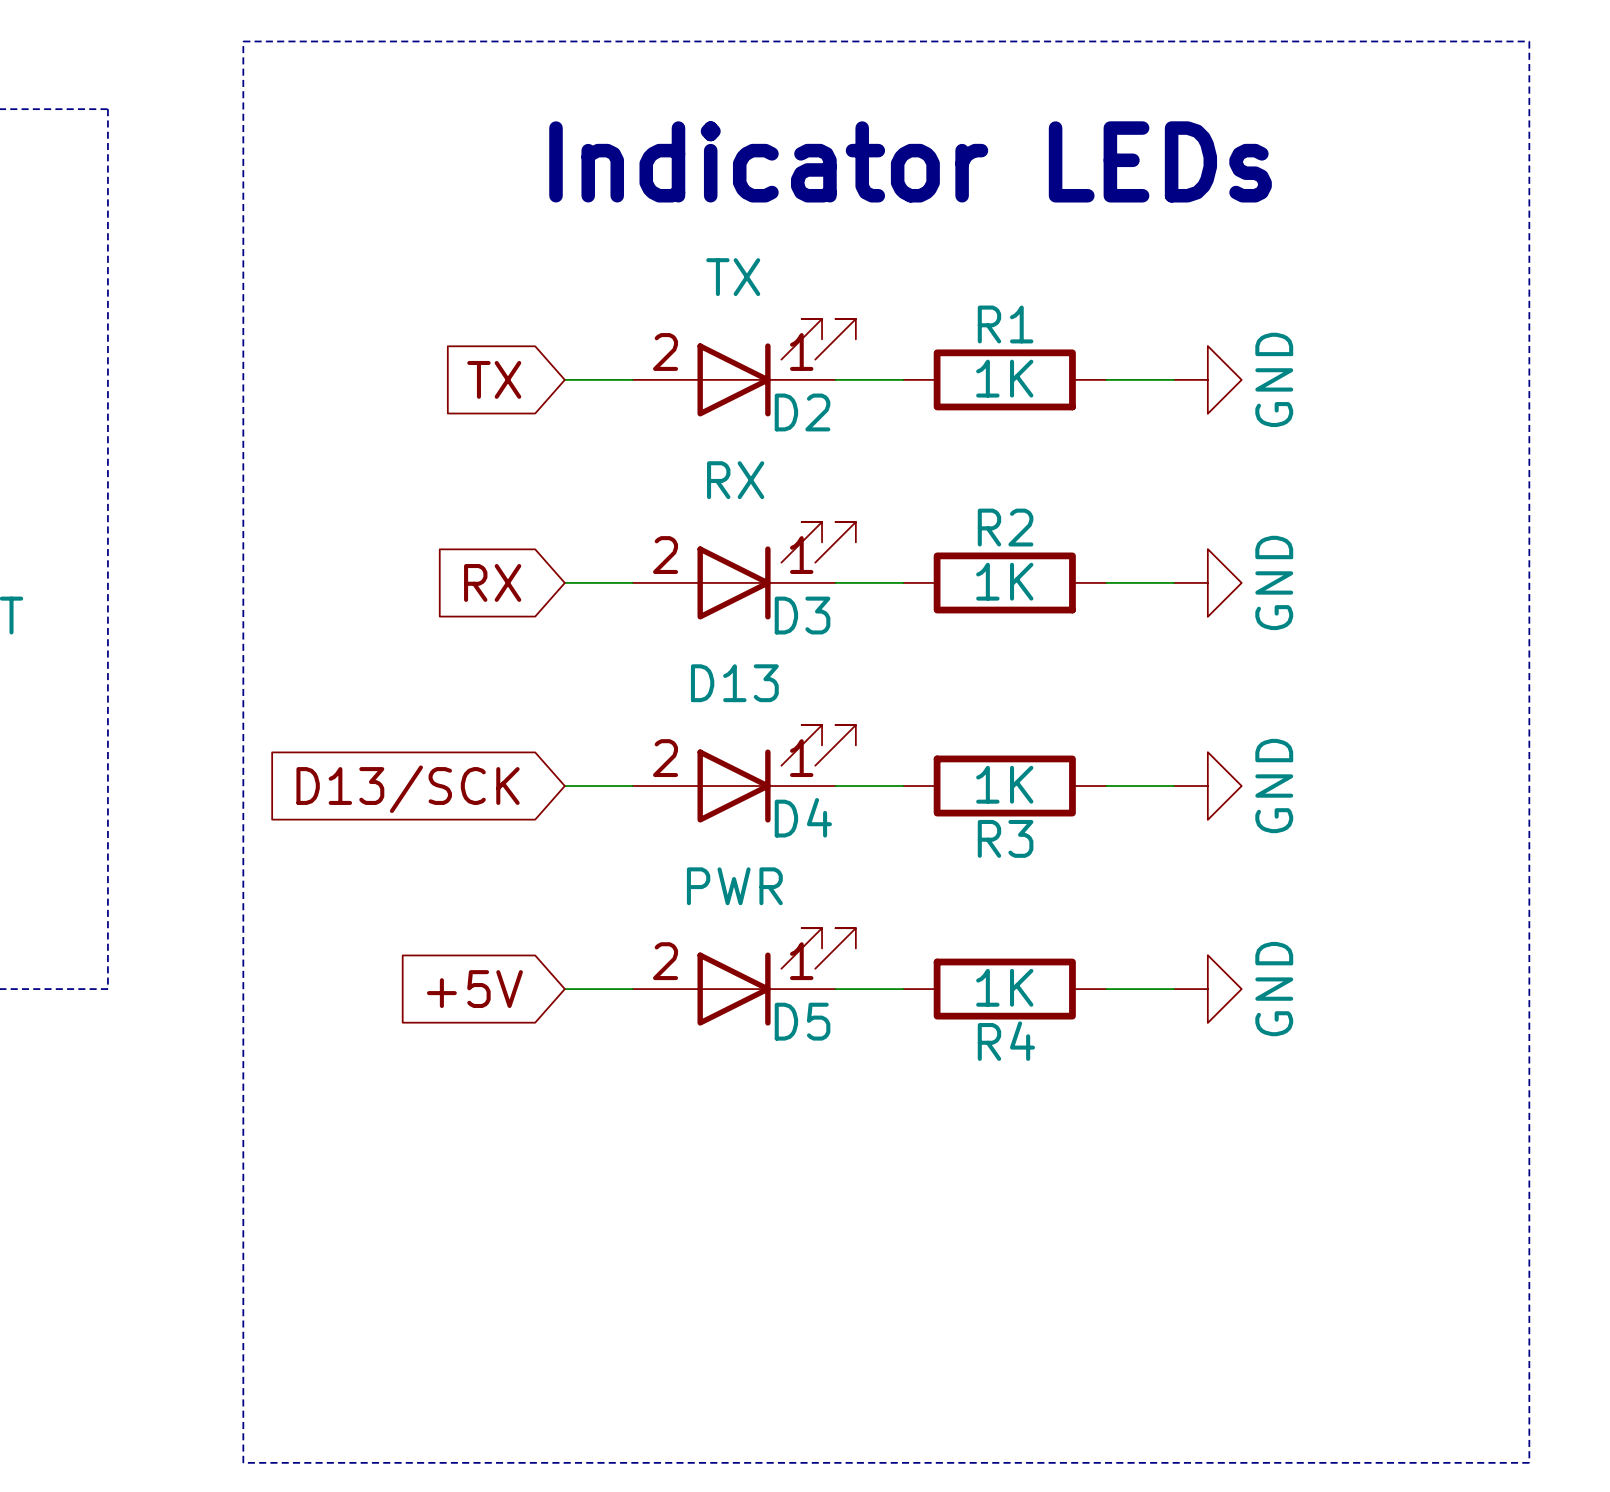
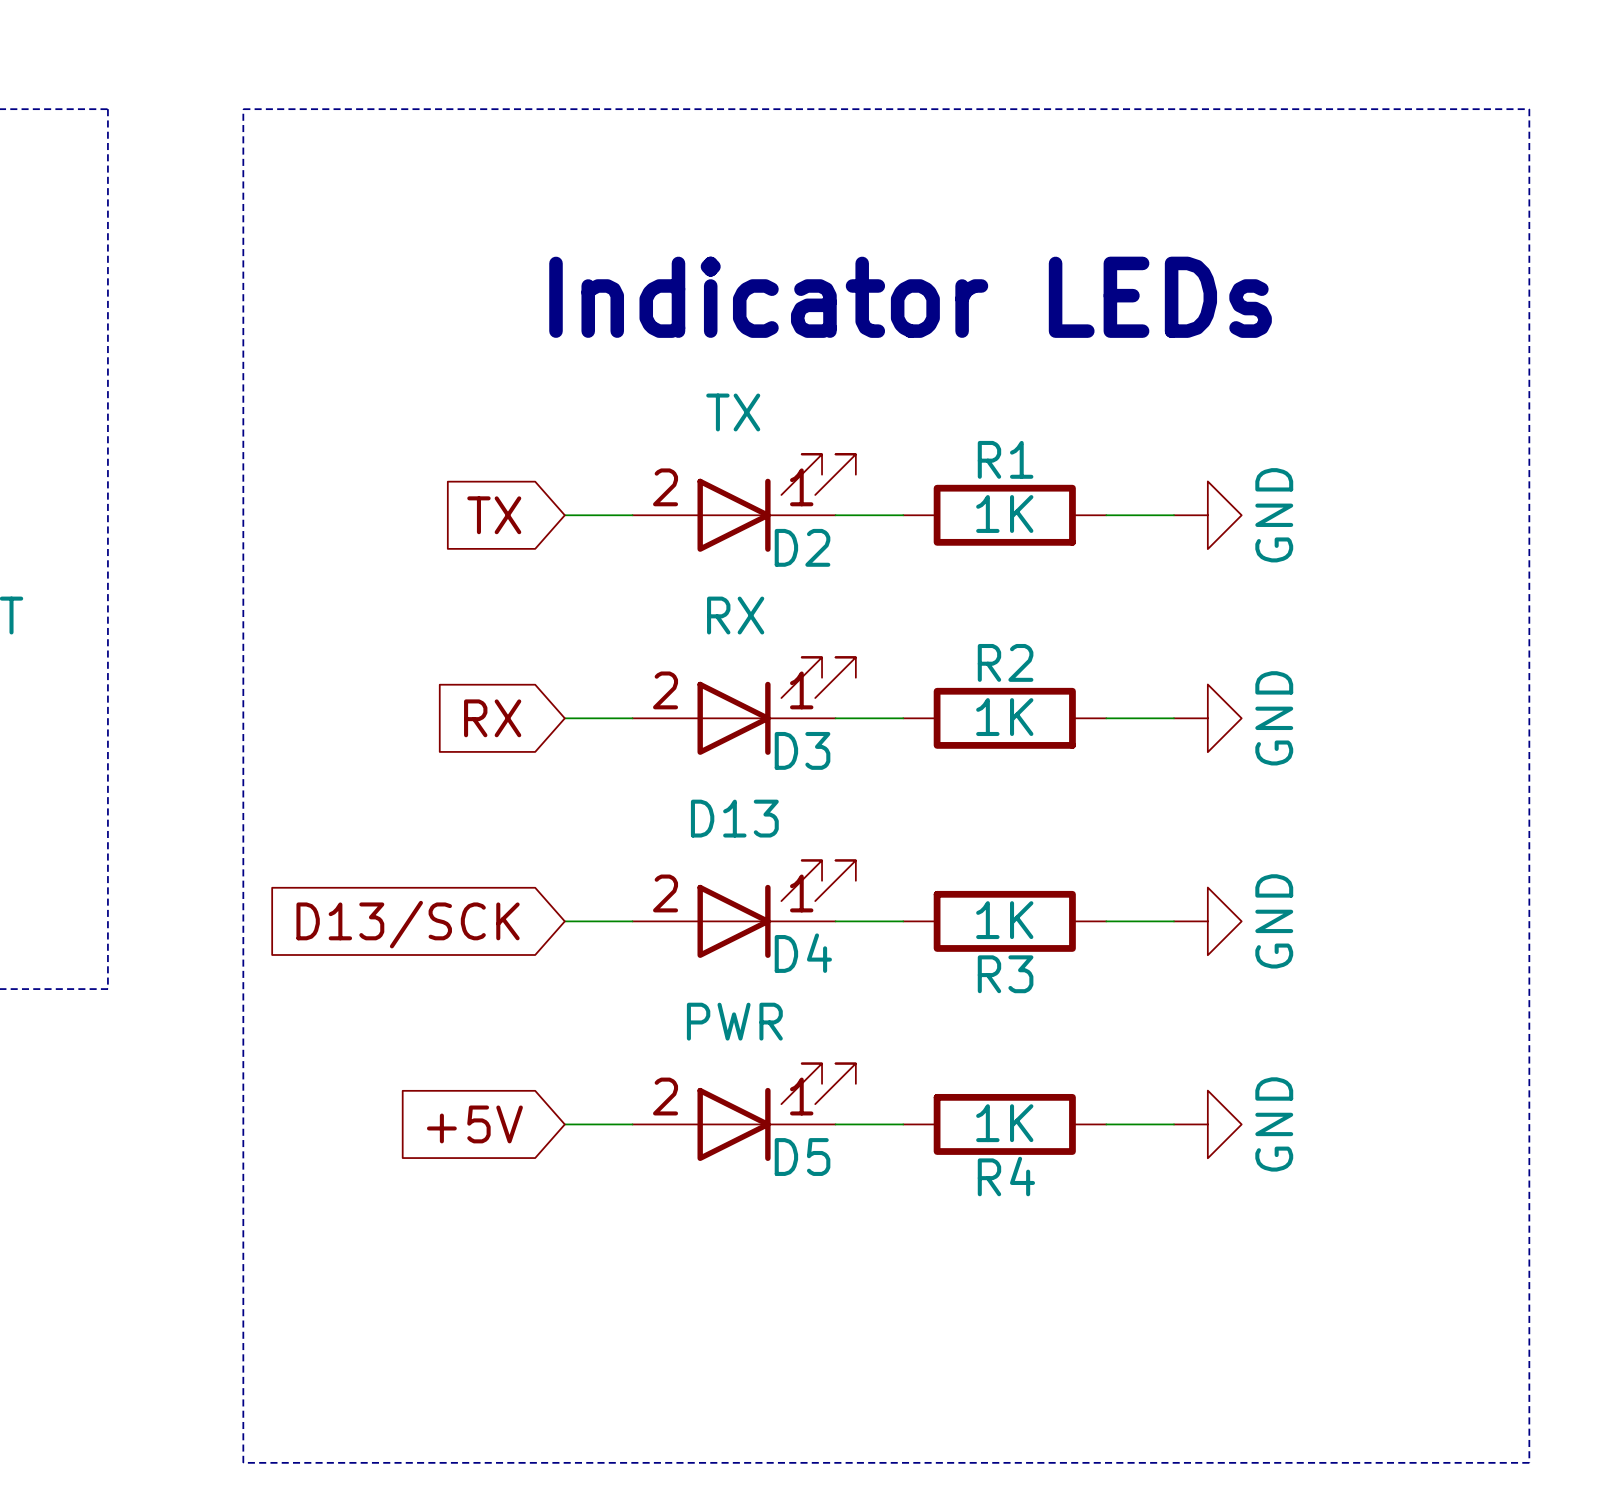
line: (243, 109) (243, 41) (1529, 41) (1529, 109) -> (243, 109) (1529, 109)
text position: Indicator LEDs (910, 161) -> Indicator LEDs (910, 297)
D2 position: (744, 367) -> (744, 503)
global label position: TX (494, 379) -> TX (494, 515)
wire: (564, 379) (632, 379) -> (564, 515) (632, 515)
wire: (835, 379) (903, 379) -> (835, 515) (903, 515)
R1 position: (1004, 379) -> (1004, 515)
wire: (1106, 379) (1173, 379) -> (1106, 515) (1173, 515)
power symbol: GND (1207, 379) -> none
power symbol: none -> GND (1207, 515)
D3 position: (744, 570) -> (744, 706)
global label position: RX (492, 582) -> RX (492, 718)
wire: (564, 582) (632, 582) -> (564, 718) (632, 718)
wire: (835, 582) (903, 582) -> (835, 718) (903, 718)
R2 position: (1004, 582) -> (1004, 718)
wire: (1106, 582) (1173, 582) -> (1106, 718) (1173, 718)
power symbol: GND (1207, 582) -> none
power symbol: none -> GND (1207, 718)
D4 position: (744, 773) -> (744, 909)
wire: (564, 786) (632, 786) -> (564, 921) (632, 921)
wire: (835, 786) (903, 786) -> (835, 921) (903, 921)
R3 position: (1004, 786) -> (1004, 921)
wire: (1106, 786) (1173, 786) -> (1106, 921) (1173, 921)
power symbol: GND (1207, 786) -> none
global label position: D13/SCK (408, 789) -> D13/SCK (408, 924)
power symbol: none -> GND (1207, 921)
D5 position: (744, 976) -> (744, 1112)
global label position: +5V (474, 989) -> +5V (474, 1124)
wire: (564, 989) (632, 989) -> (564, 1124) (632, 1124)
wire: (835, 989) (903, 989) -> (835, 1124) (903, 1124)
R4 position: (1004, 989) -> (1004, 1124)
wire: (1106, 989) (1173, 989) -> (1106, 1124) (1173, 1124)
power symbol: GND (1207, 989) -> none
power symbol: none -> GND (1207, 1124)

